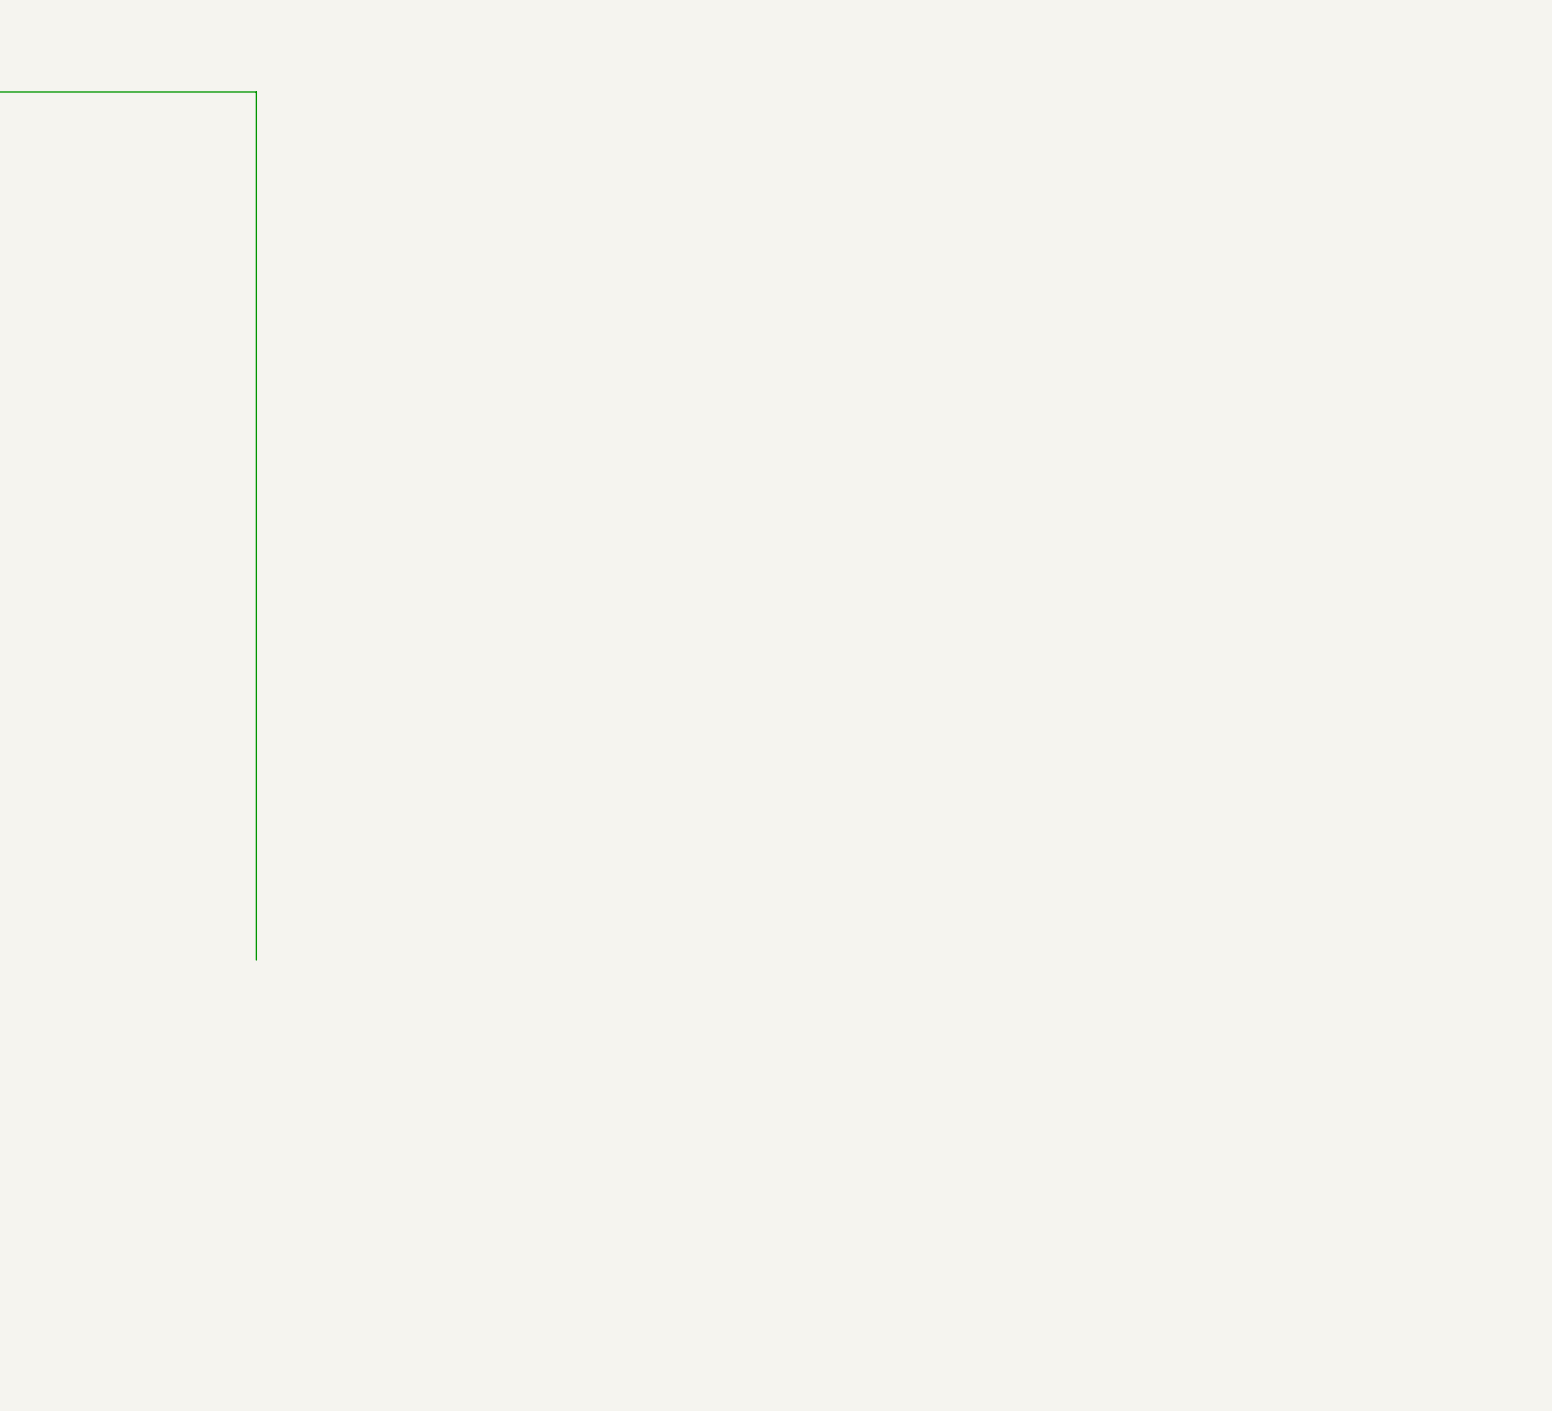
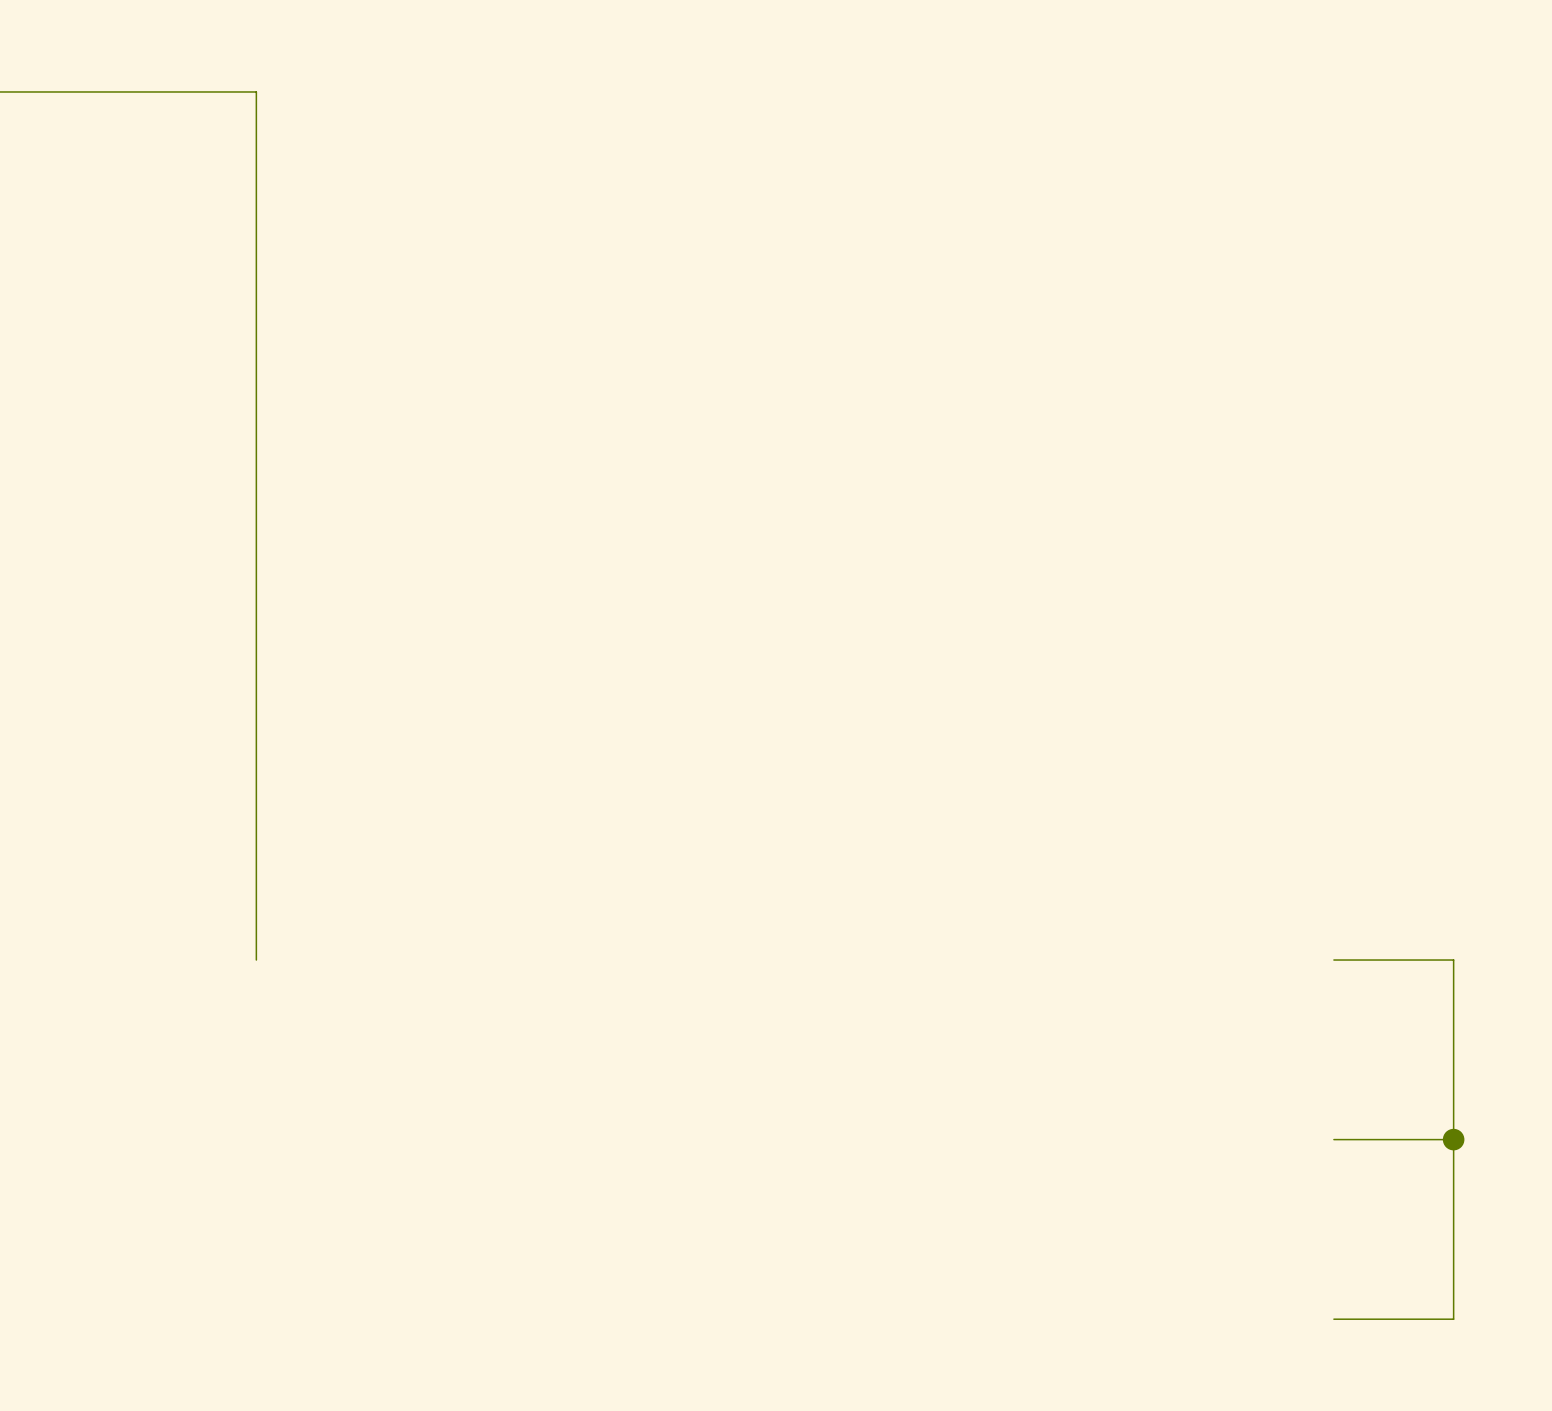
wire: none -> (1333, 960) (1453, 960) (1453, 1319) (1333, 1319)
wire: none -> (1333, 1139) (1453, 1139)
junction: none -> (1453, 1139)

